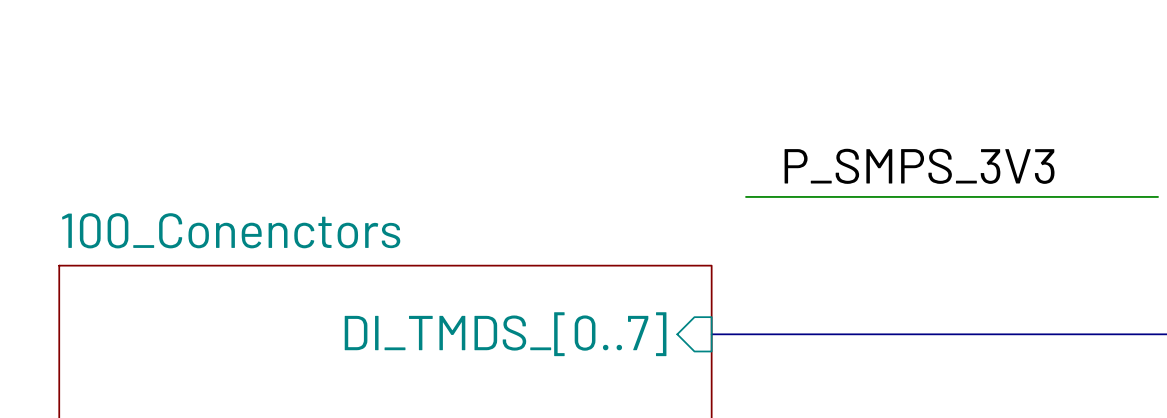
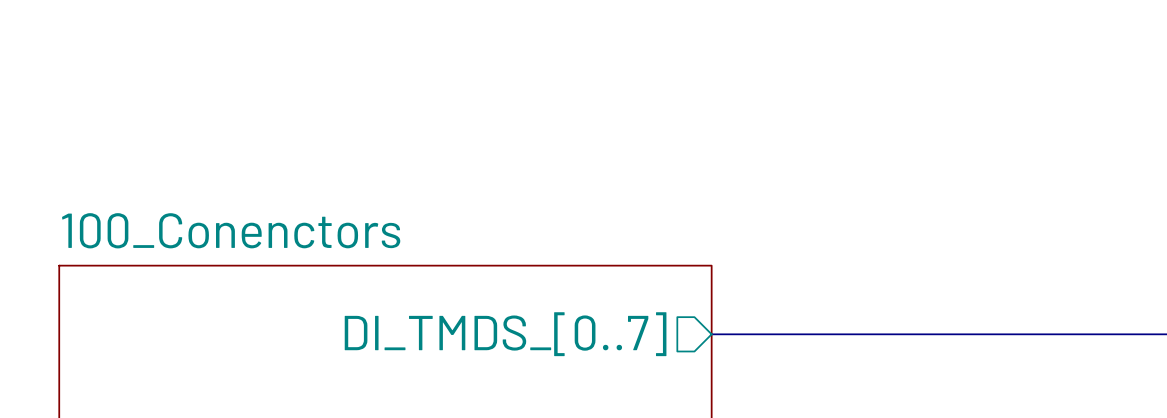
label: P_SMPS_3V3 (919, 166) -> none
wire: (745, 196) (1158, 196) -> none
sheet pin shape: input (505, 334) -> output (505, 334)

